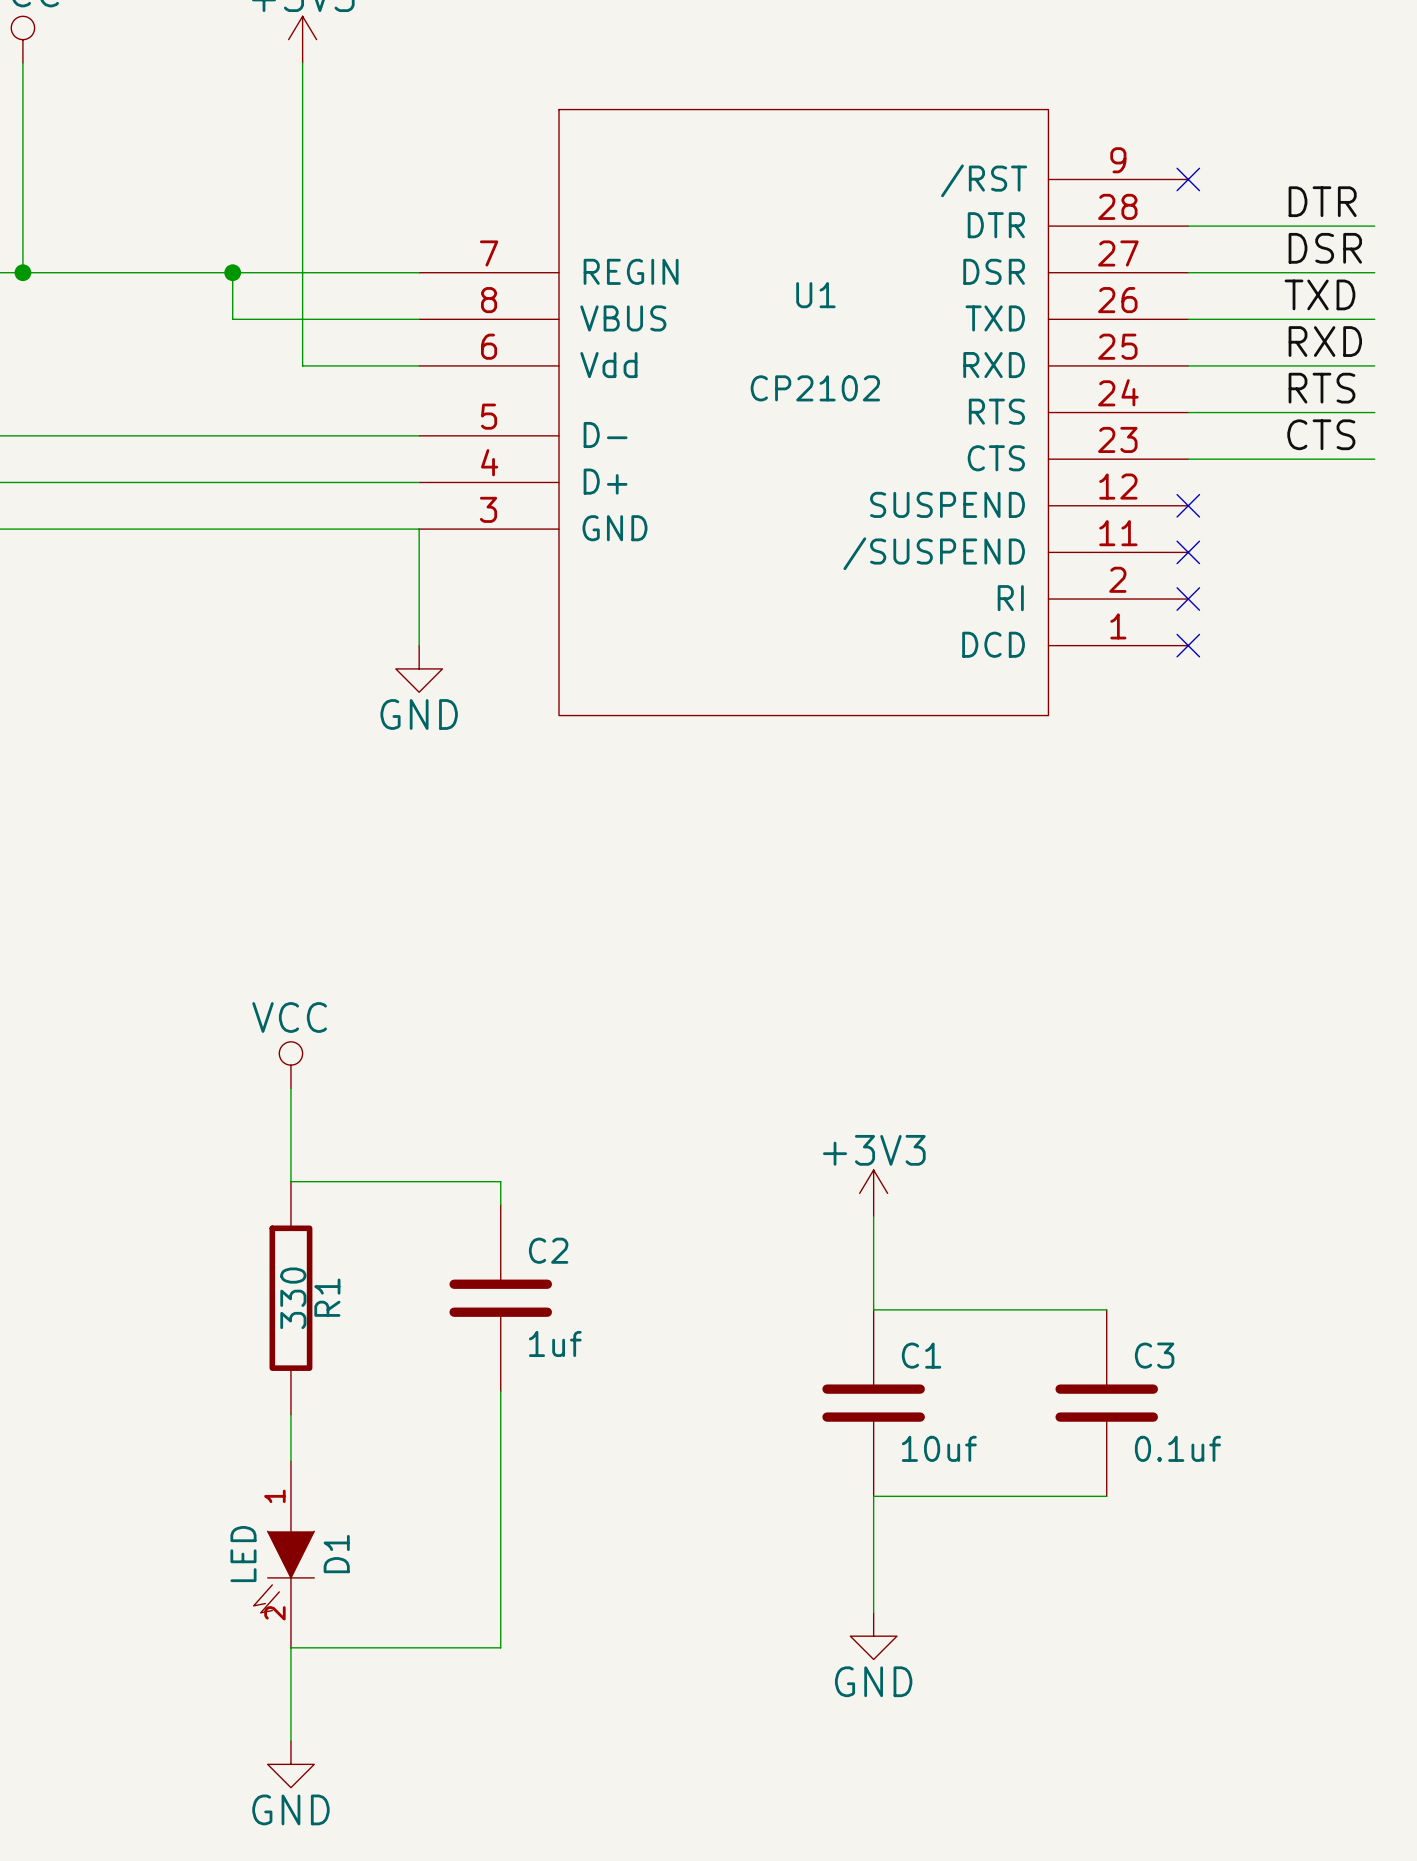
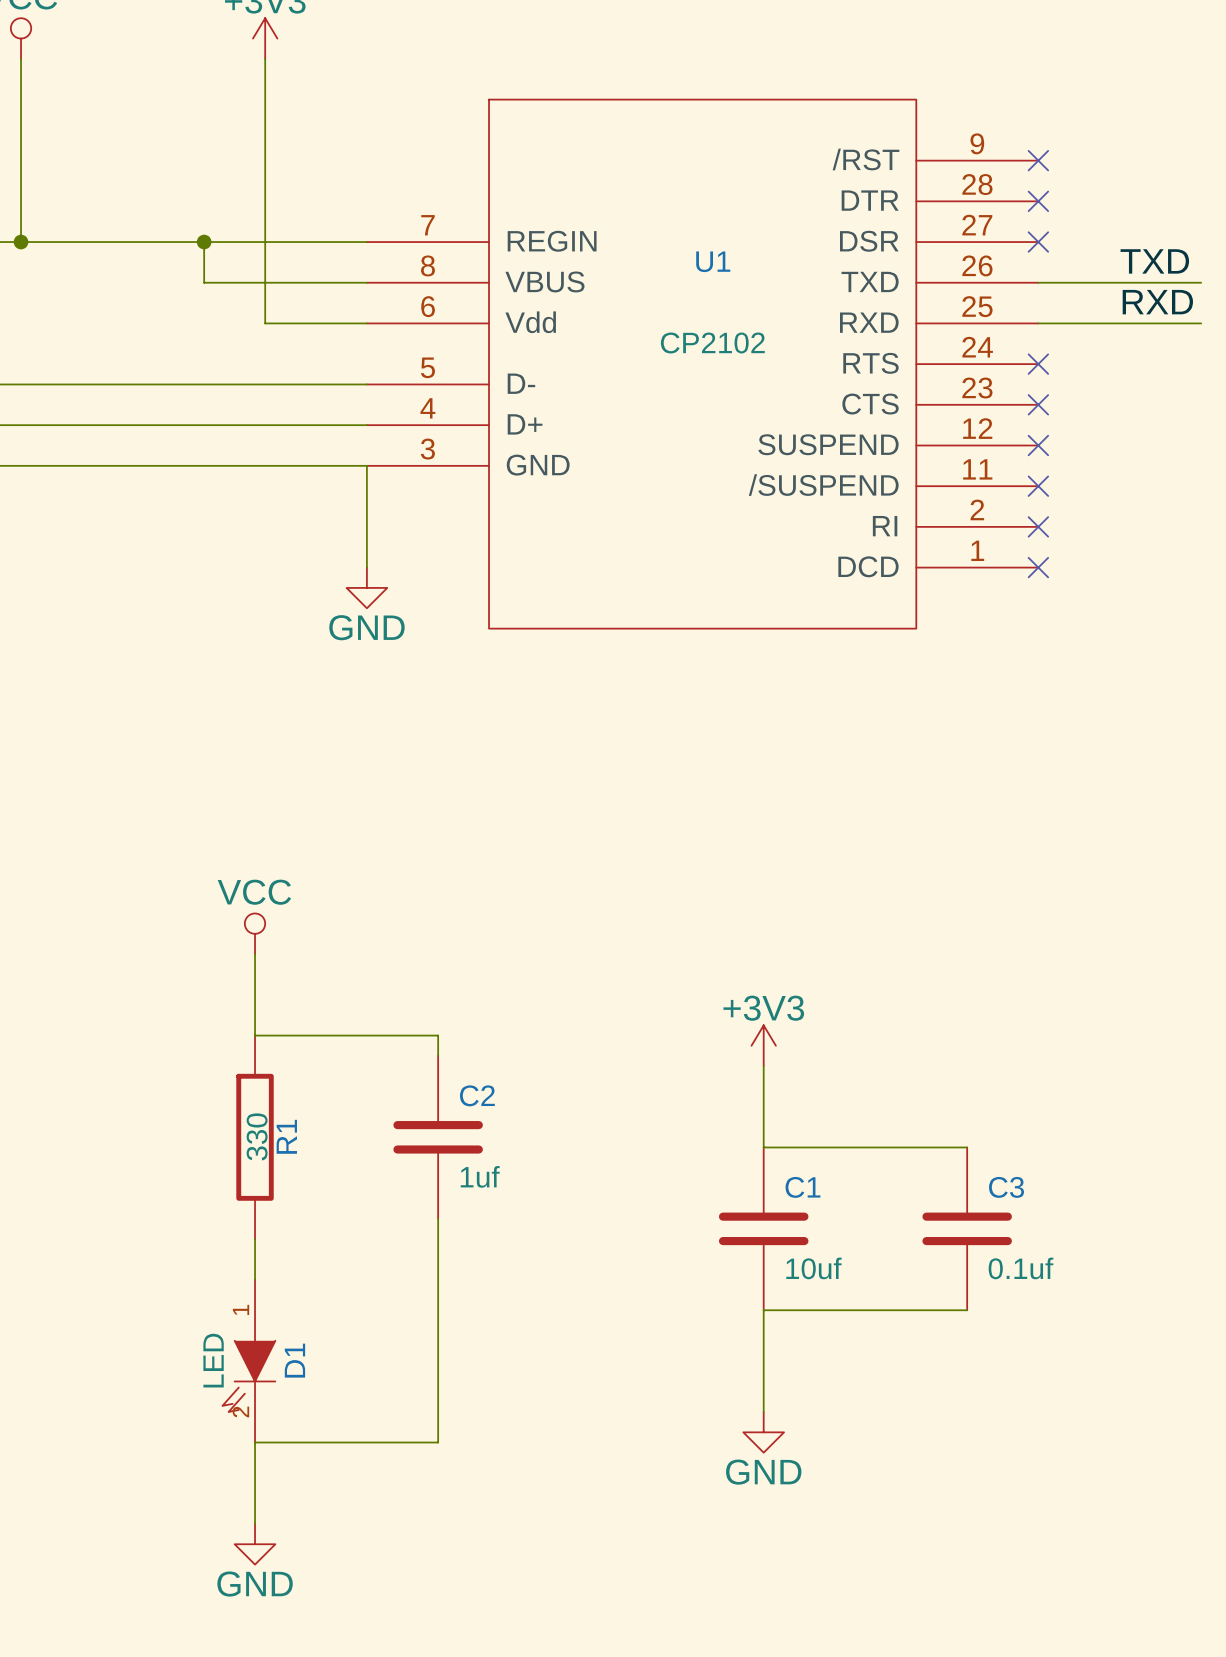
label: DTR (1322, 201) -> none
wire: (1188, 226) (1374, 226) -> none
no-connect mark: none -> (1038, 201)
label: DSR (1325, 248) -> none
wire: (1188, 272) (1374, 272) -> none
no-connect mark: none -> (1038, 242)
label: RTS (1321, 388) -> none
wire: (1188, 412) (1374, 412) -> none
no-connect mark: none -> (1038, 364)
label: CTS (1321, 434) -> none
wire: (1188, 459) (1374, 459) -> none
no-connect mark: none -> (1038, 404)

